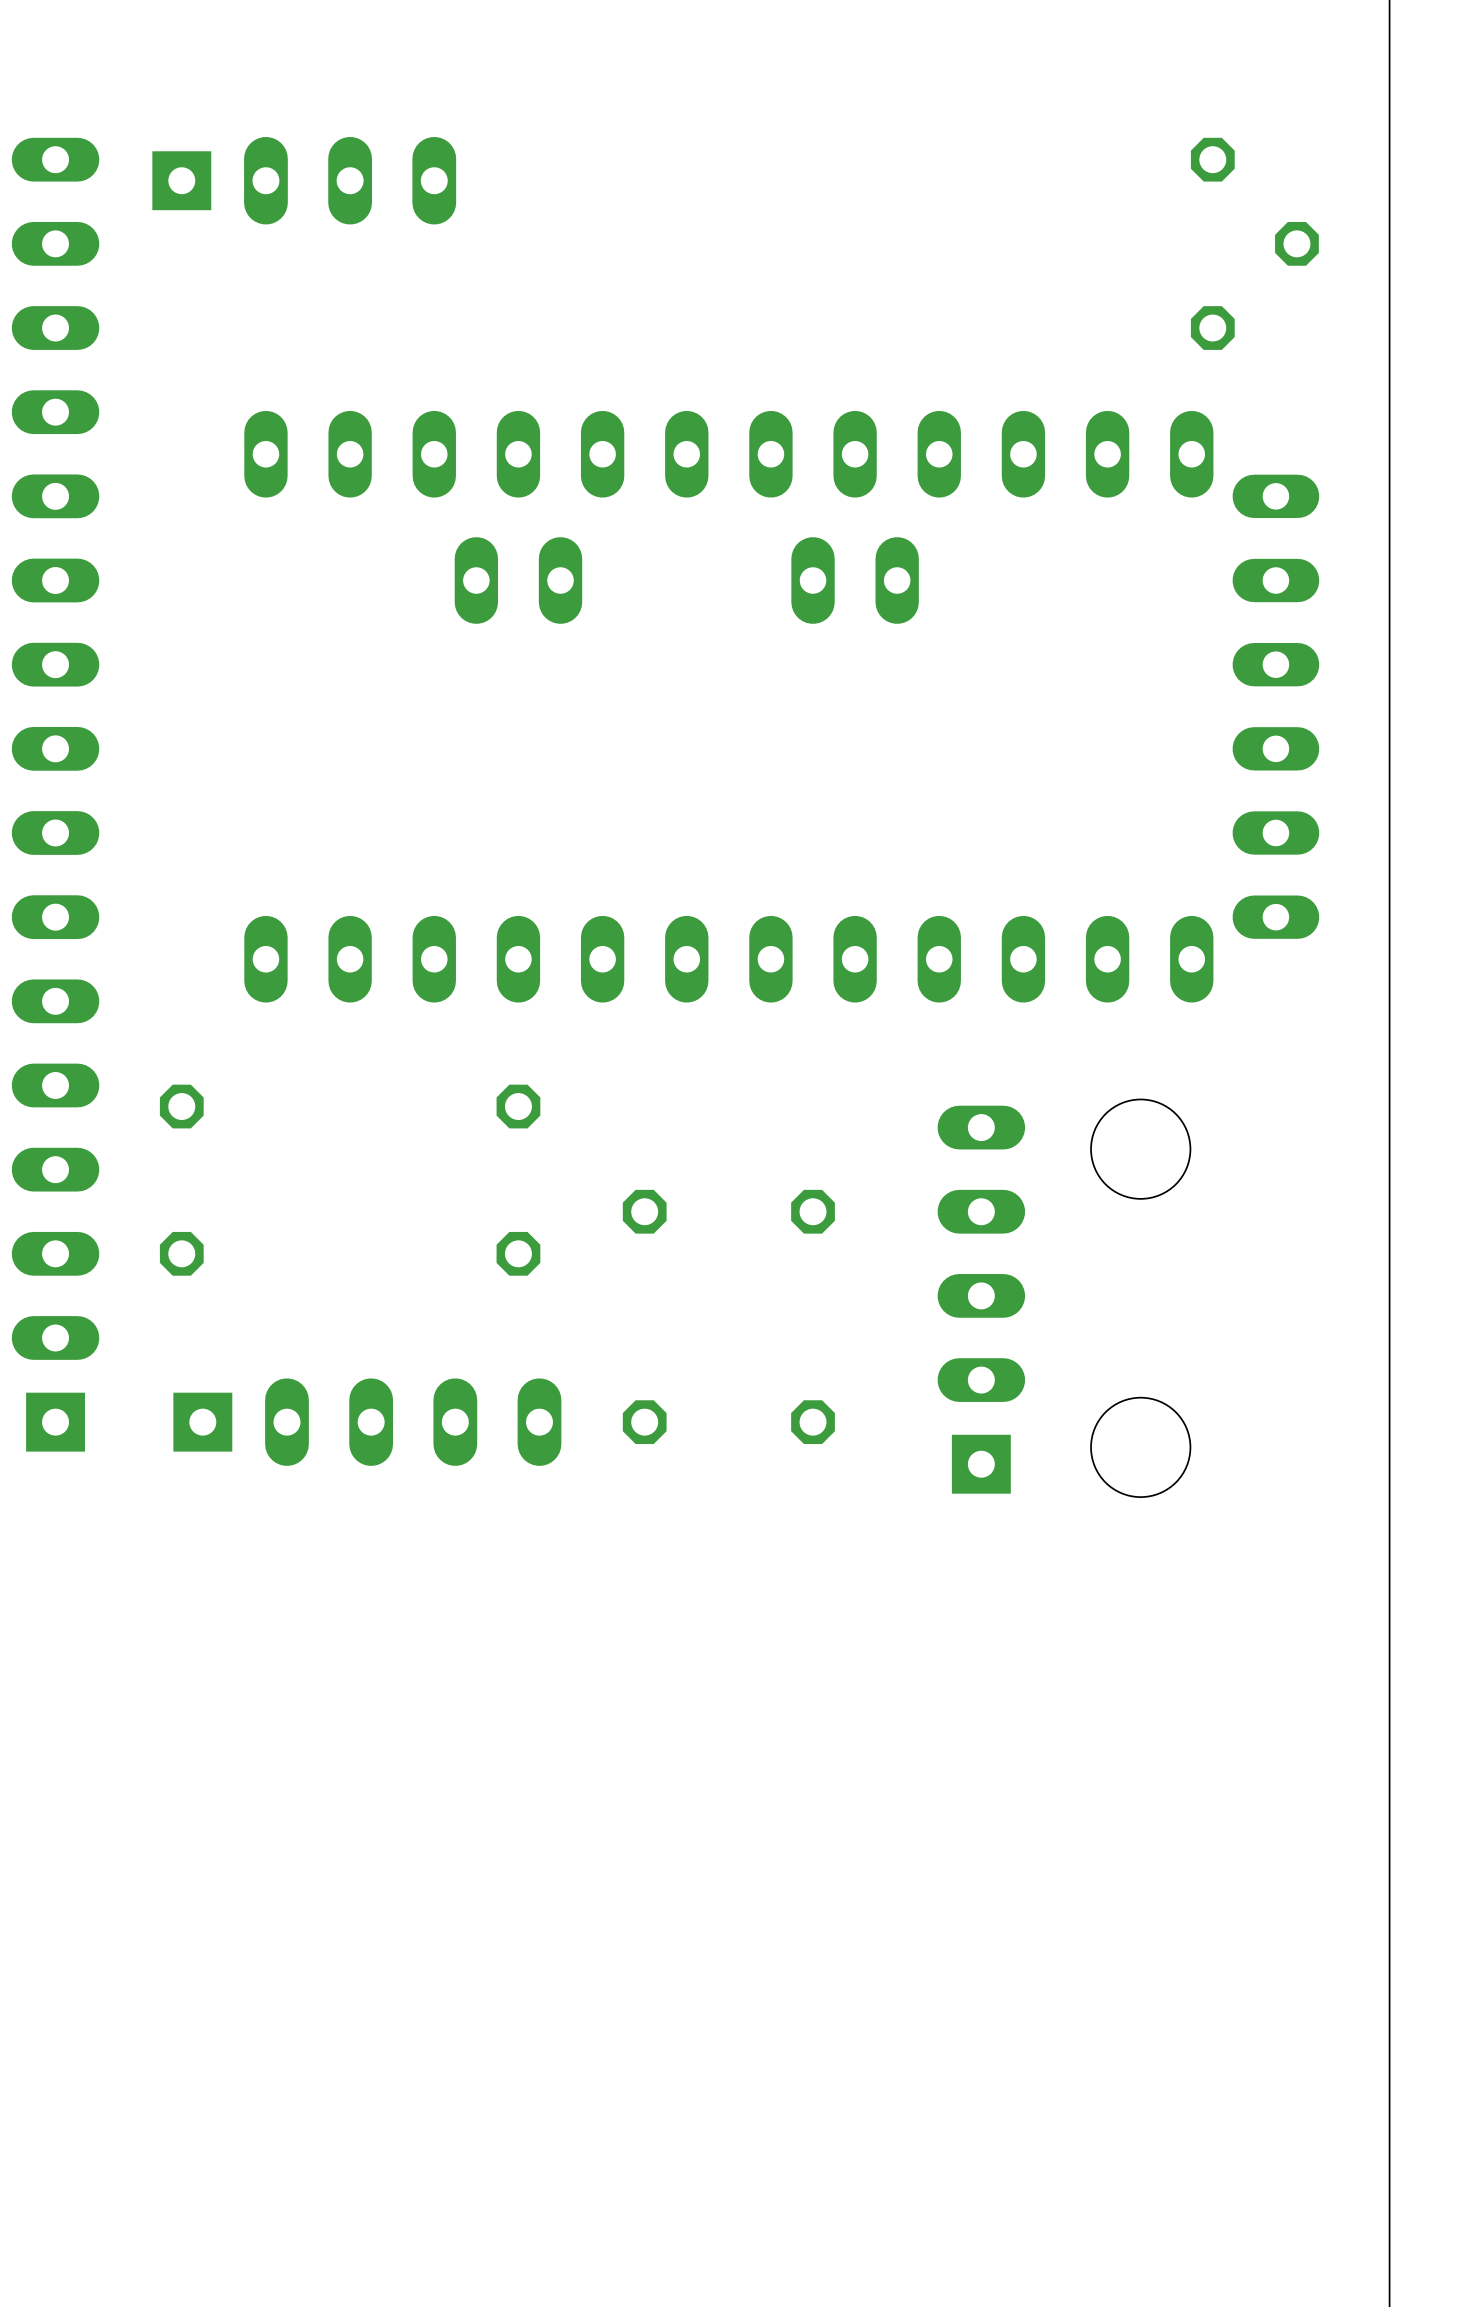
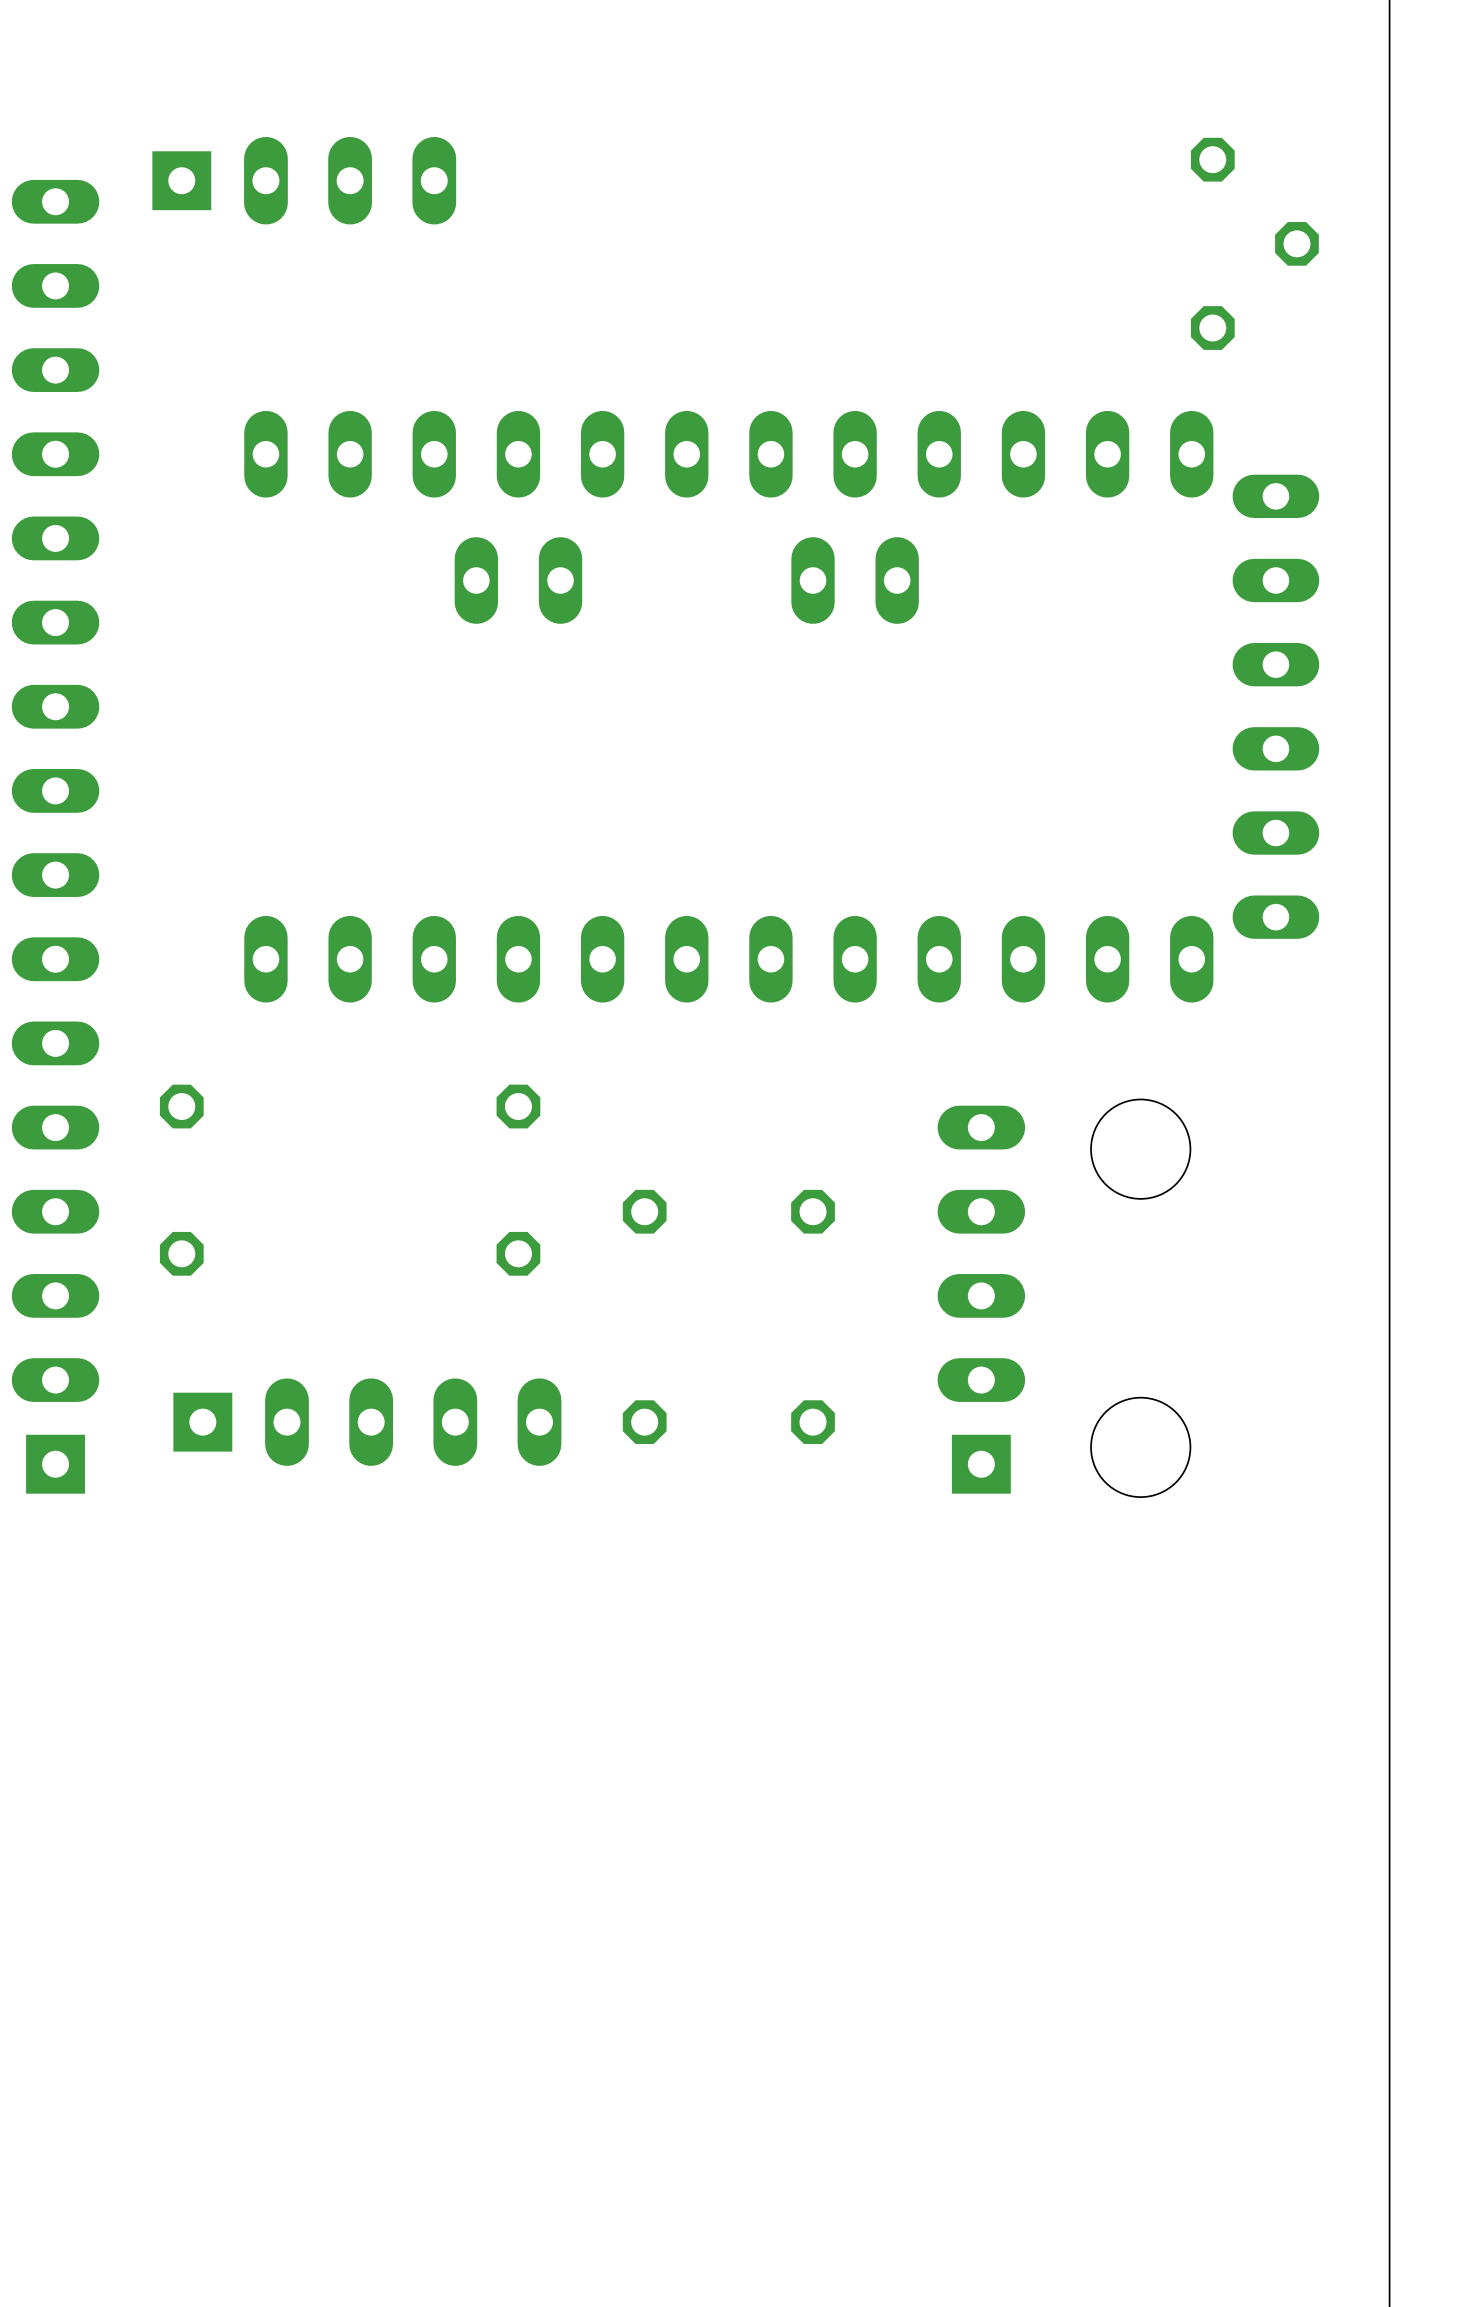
part position: (55, 794) -> (55, 836)

